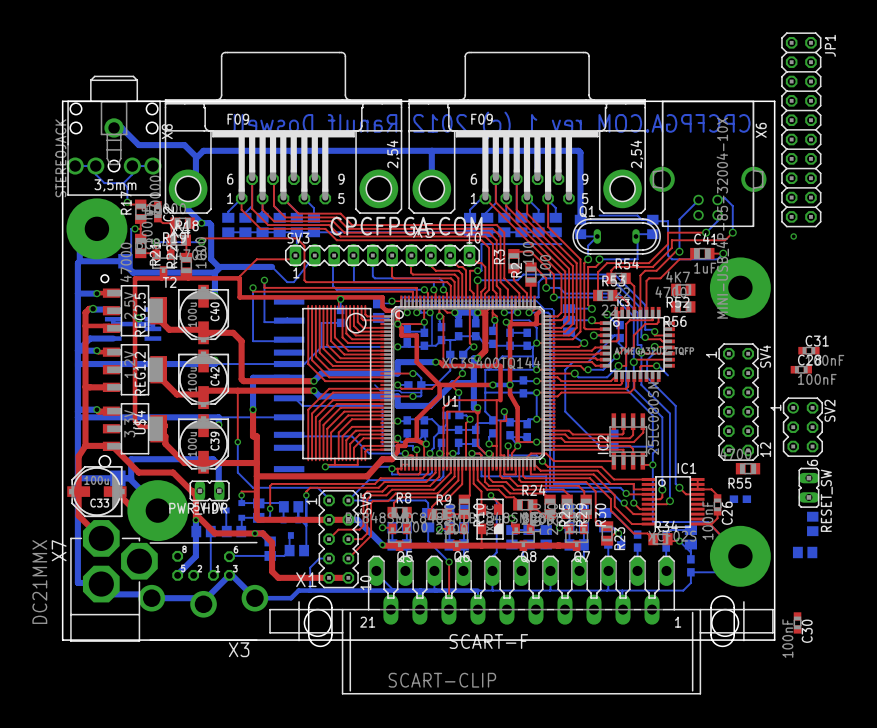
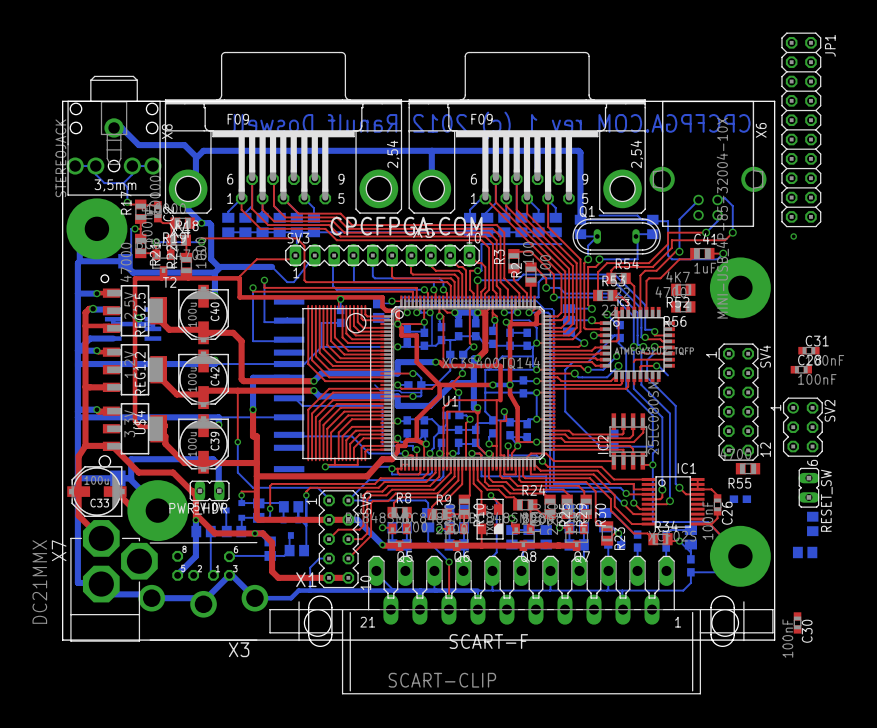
top track: (652, 311) (652, 320) (629, 320) (626, 324) (626, 346) (616, 356) -> none
top track: (658, 312) (658, 322) (656, 324) (645, 324) (633, 335) (633, 346) (626, 354) (626, 365) (618, 365) -> none
via: none -> (633, 346)
via: none -> (643, 346)
via: (641, 352) -> none
via: (633, 362) -> none
top track: (634, 384) (634, 388) (629, 392) (561, 392) (557, 396) (549, 396) -> none

